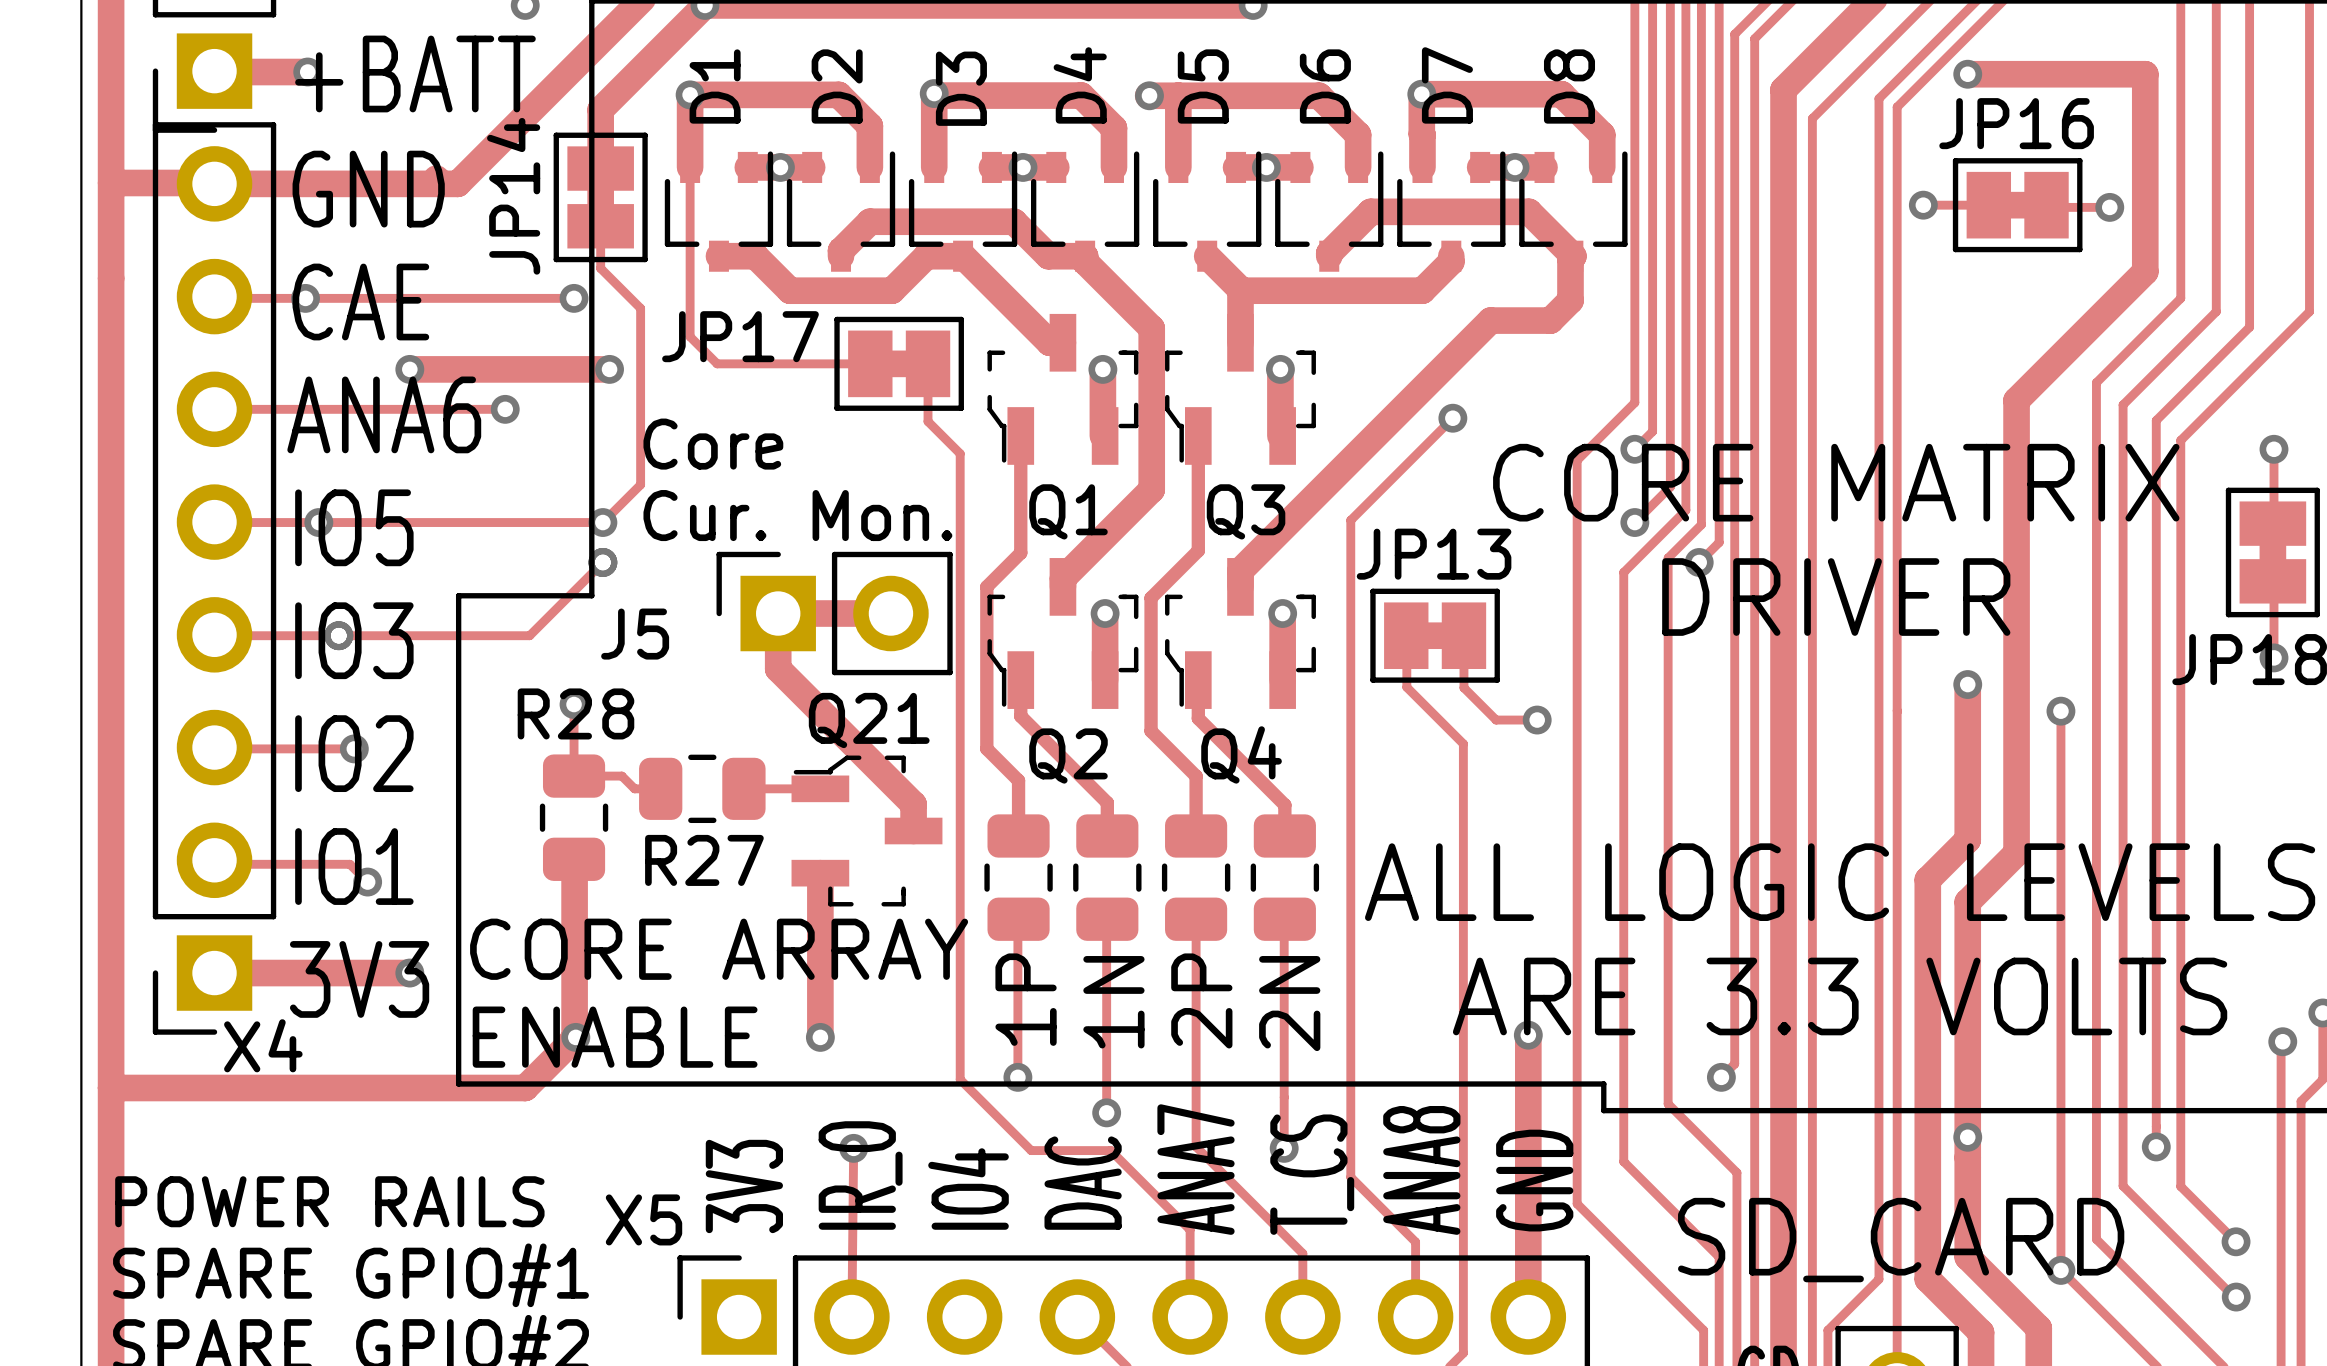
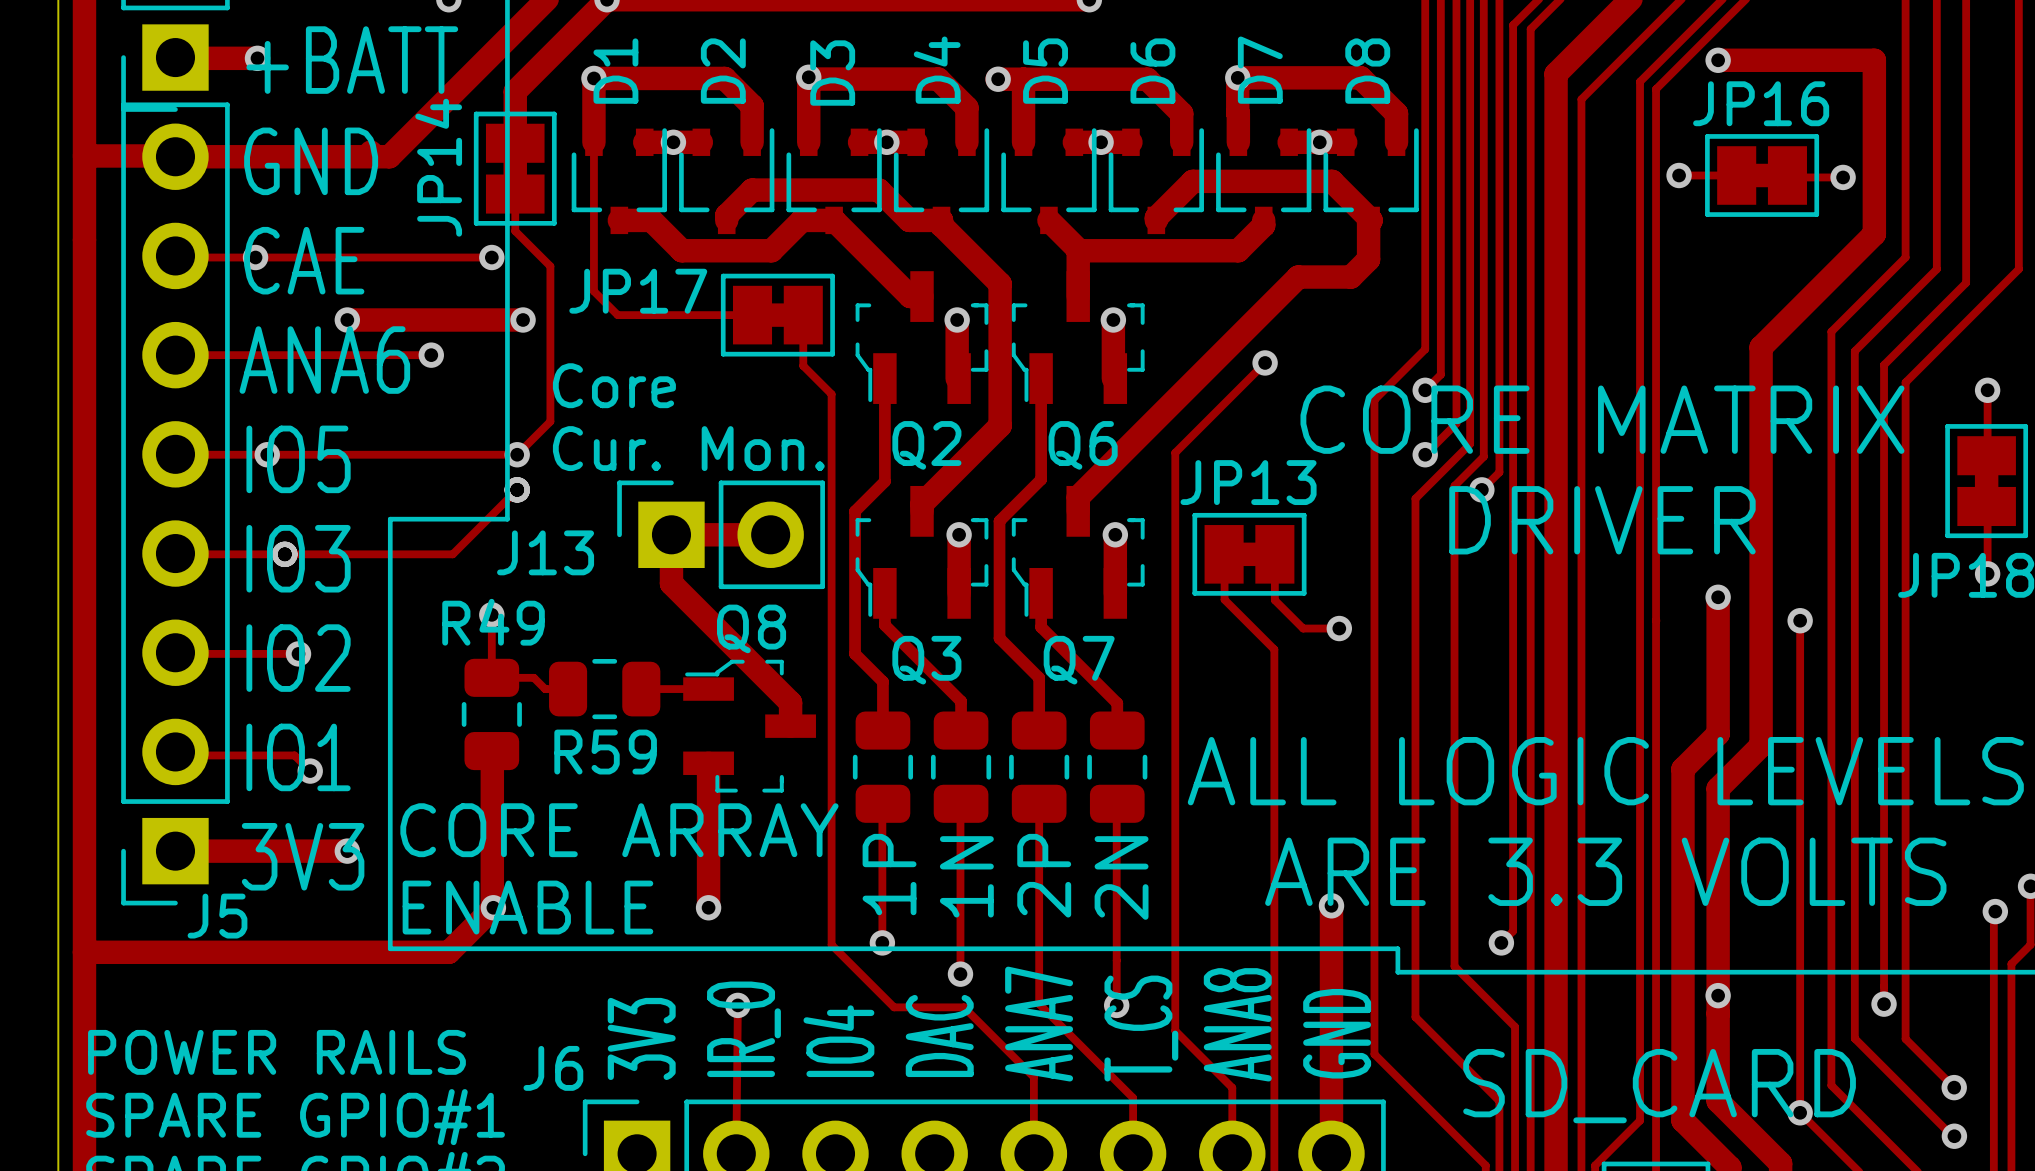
Q1 name: Q1 (1068, 511) -> Q2 (926, 445)
Q3 name: Q3 (1246, 511) -> Q6 (1083, 445)
J5 name: J5 (635, 634) -> J13 (545, 552)
R28 name: R28 (575, 713) -> R49 (493, 622)
Q21 name: Q21 (869, 720) -> Q8 (751, 628)
Q4 name: Q4 (1241, 754) -> Q7 (1079, 660)
Q2 name: Q2 (1068, 756) -> Q3 (926, 660)
R27 name: R27 (704, 860) -> R59 (605, 752)
X4 name: X4 (263, 1045) -> J5 (217, 916)
X5 name: X5 (644, 1219) -> J6 (553, 1068)

